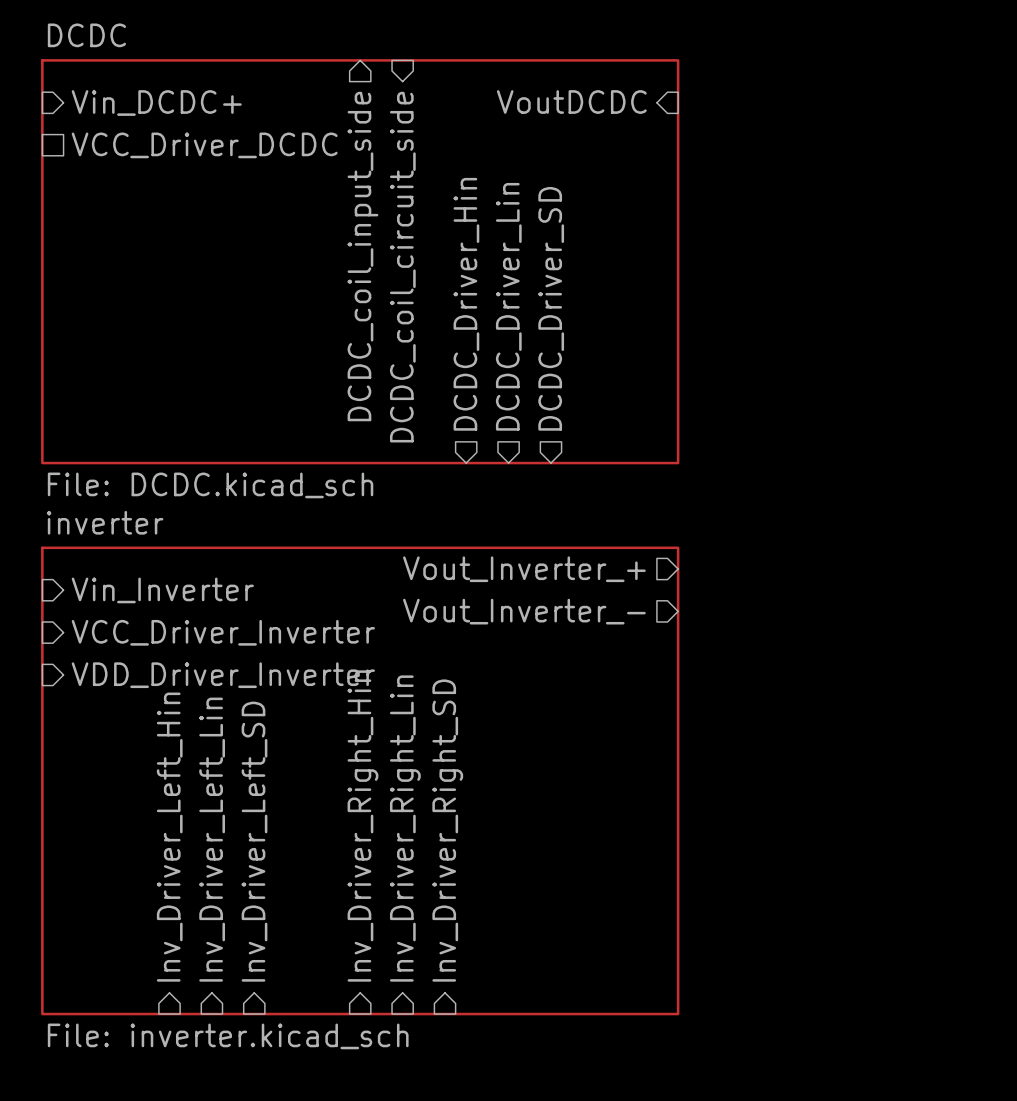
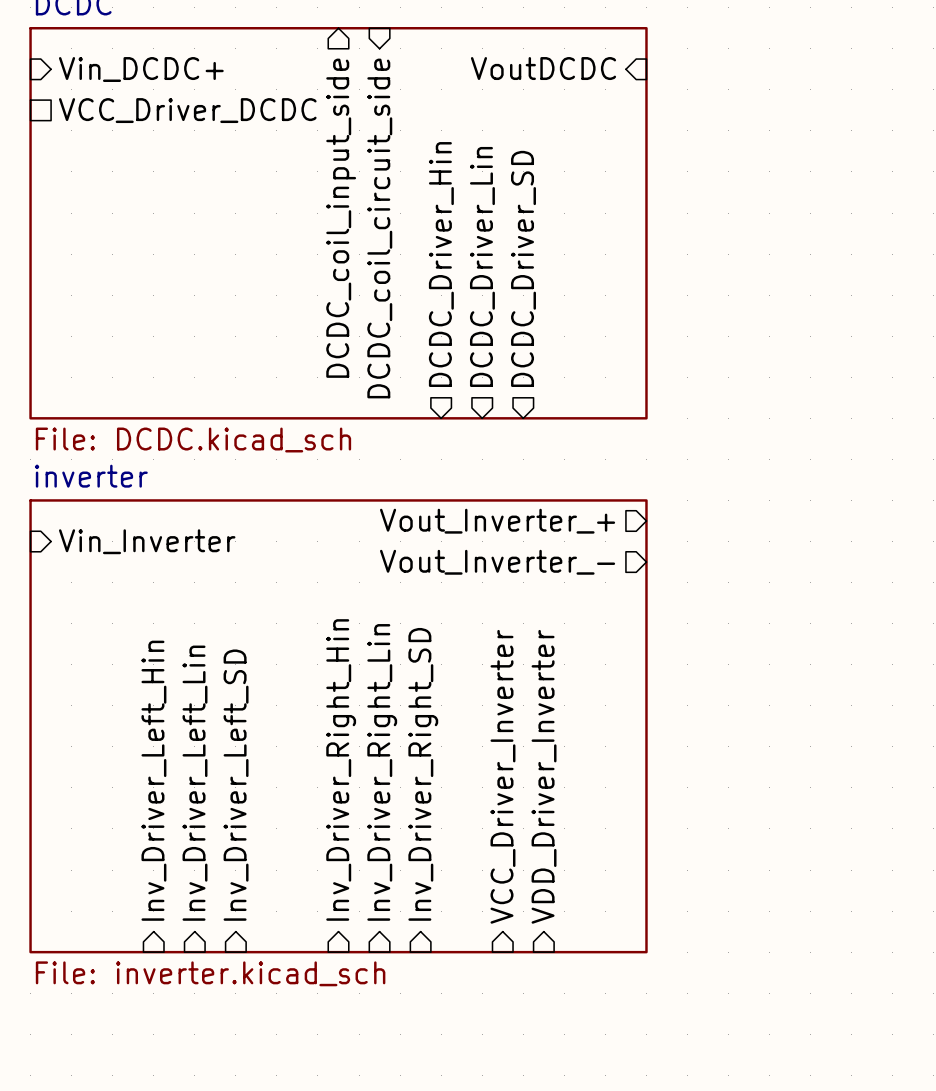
sheet pin: VCC_Driver_Inverter (223, 632) -> none
sheet pin: VDD_Driver_Inverter (223, 675) -> none
sheet pin: none -> VCC_Driver_Inverter (502, 776)
sheet pin: none -> VDD_Driver_Inverter (544, 776)

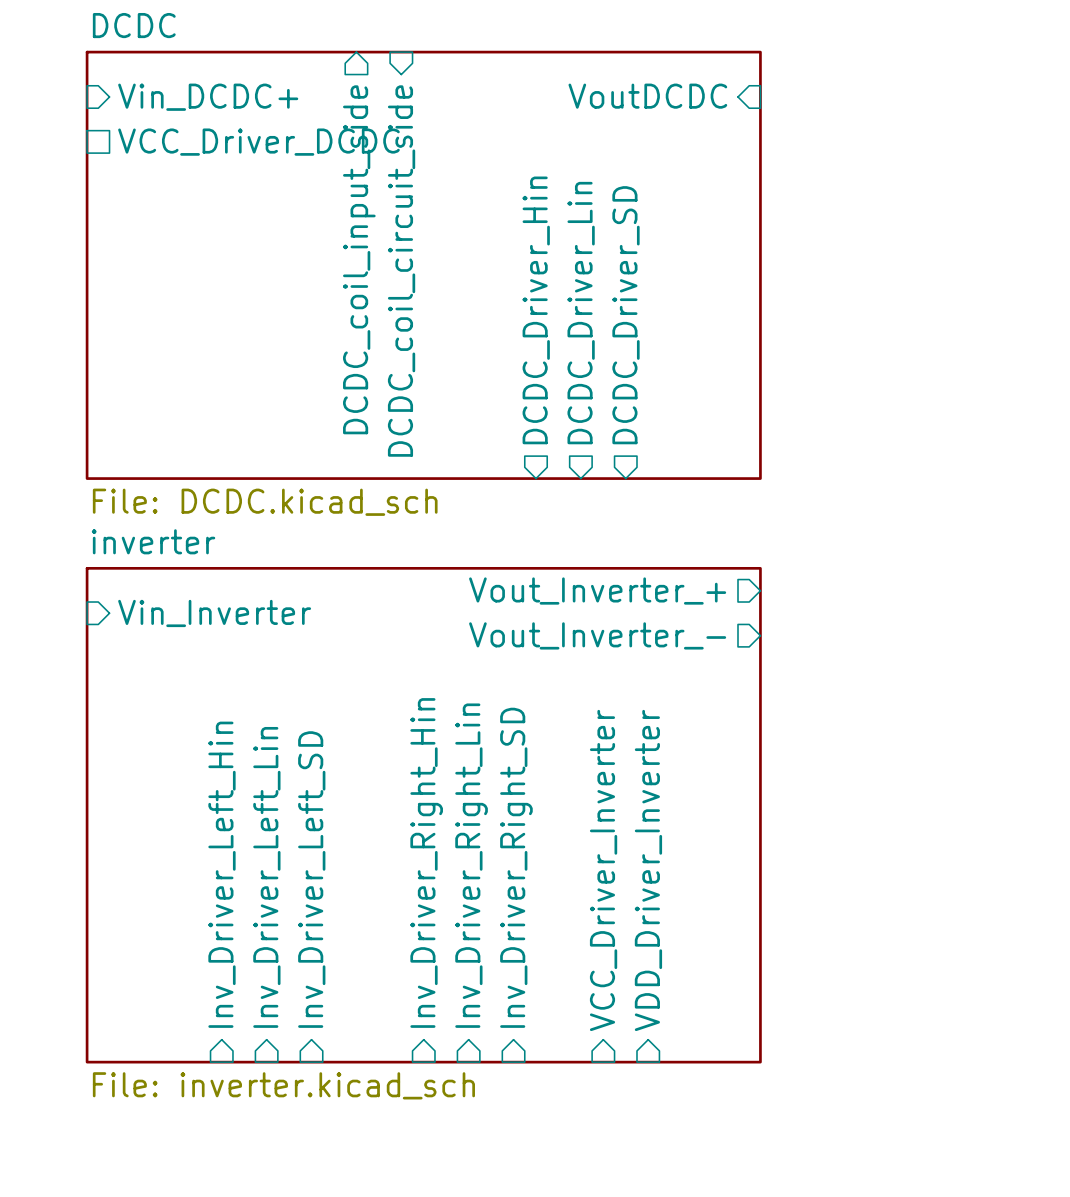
sheet pin position: DCDC_coil_input_side (341, 218) -> DCDC_coil_input_side (359, 259)
sheet pin position: DCDC_coil_circuit_side (379, 228) -> DCDC_coil_circuit_side (401, 271)

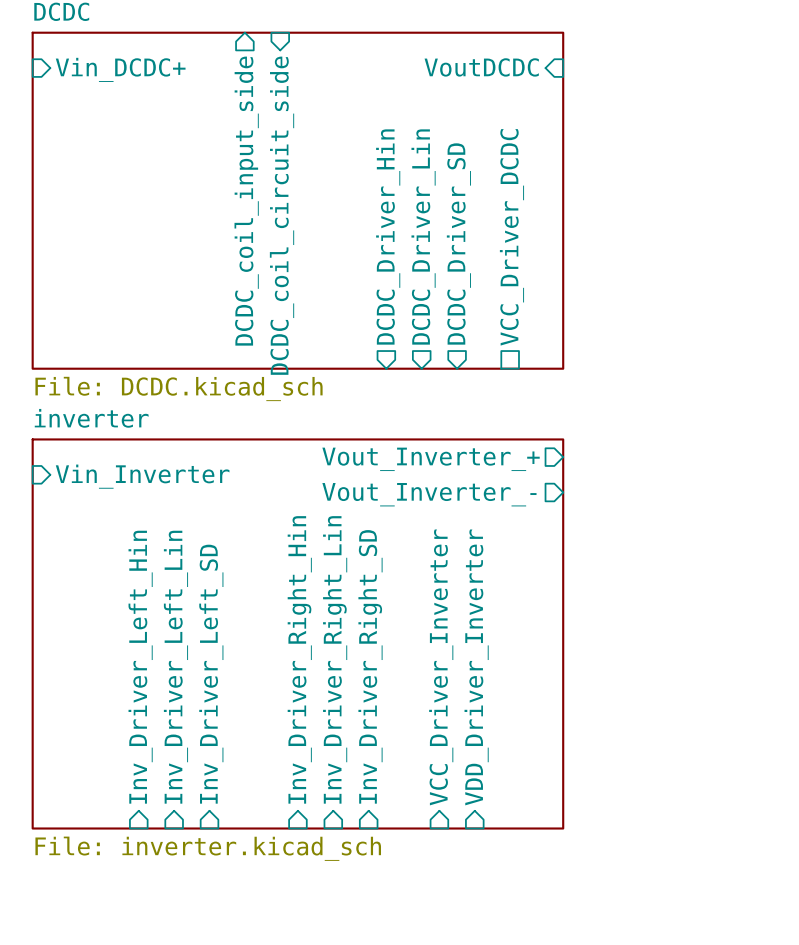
sheet pin: VCC_Driver_DCDC (258, 142) -> none
sheet pin: none -> VCC_Driver_DCDC (511, 237)

